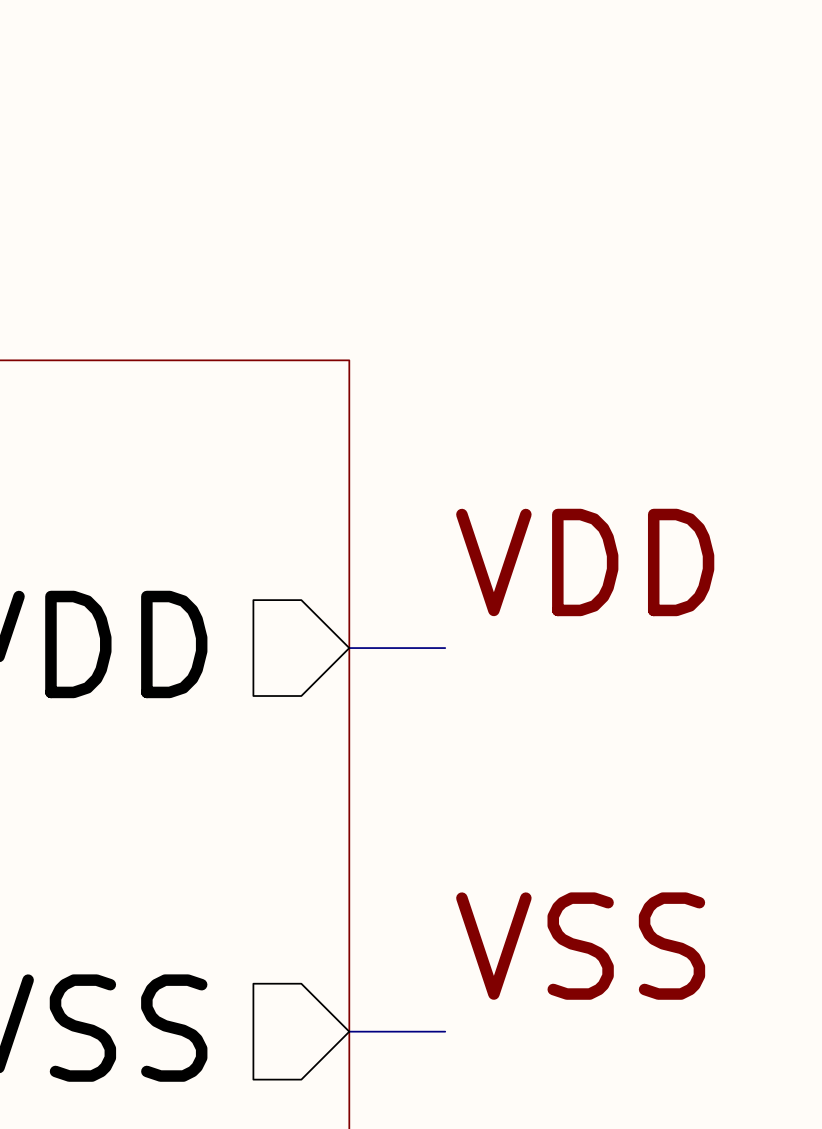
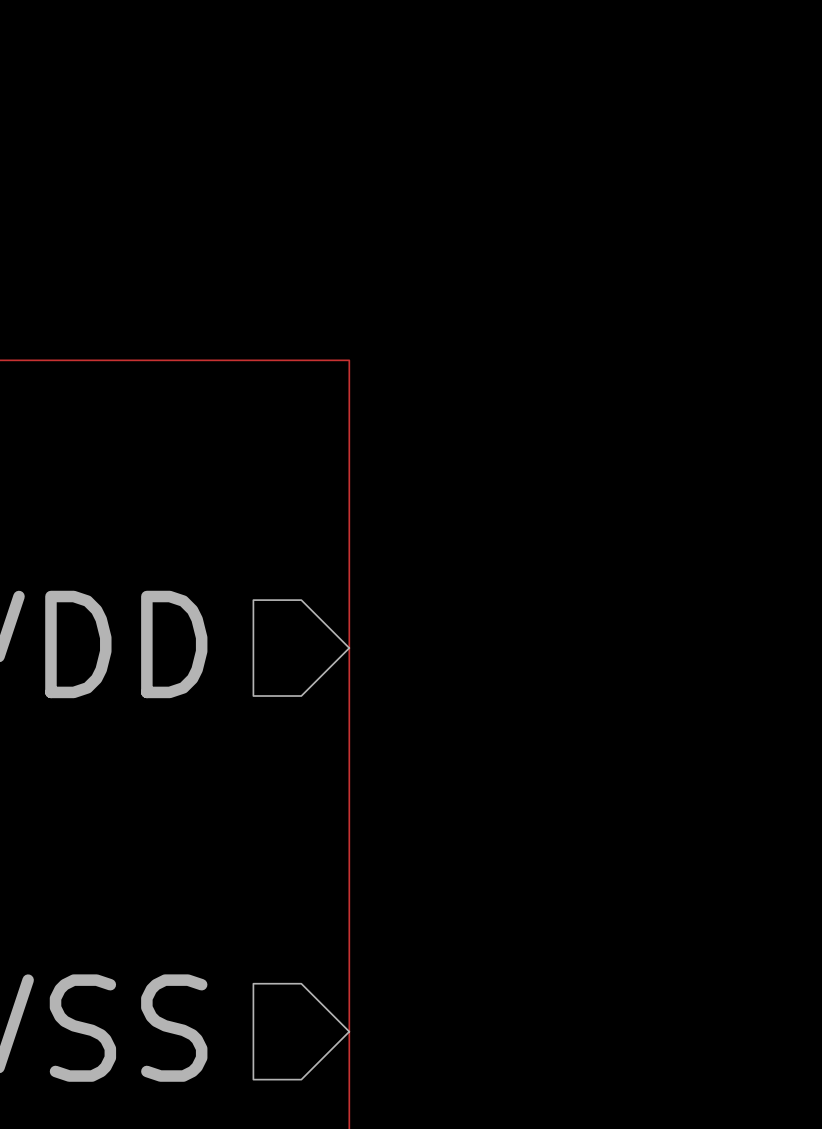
label: VDD (585, 562) -> none
wire: (349, 648) (445, 648) -> none
label: VSS (580, 946) -> none
wire: (349, 1031) (445, 1031) -> none

